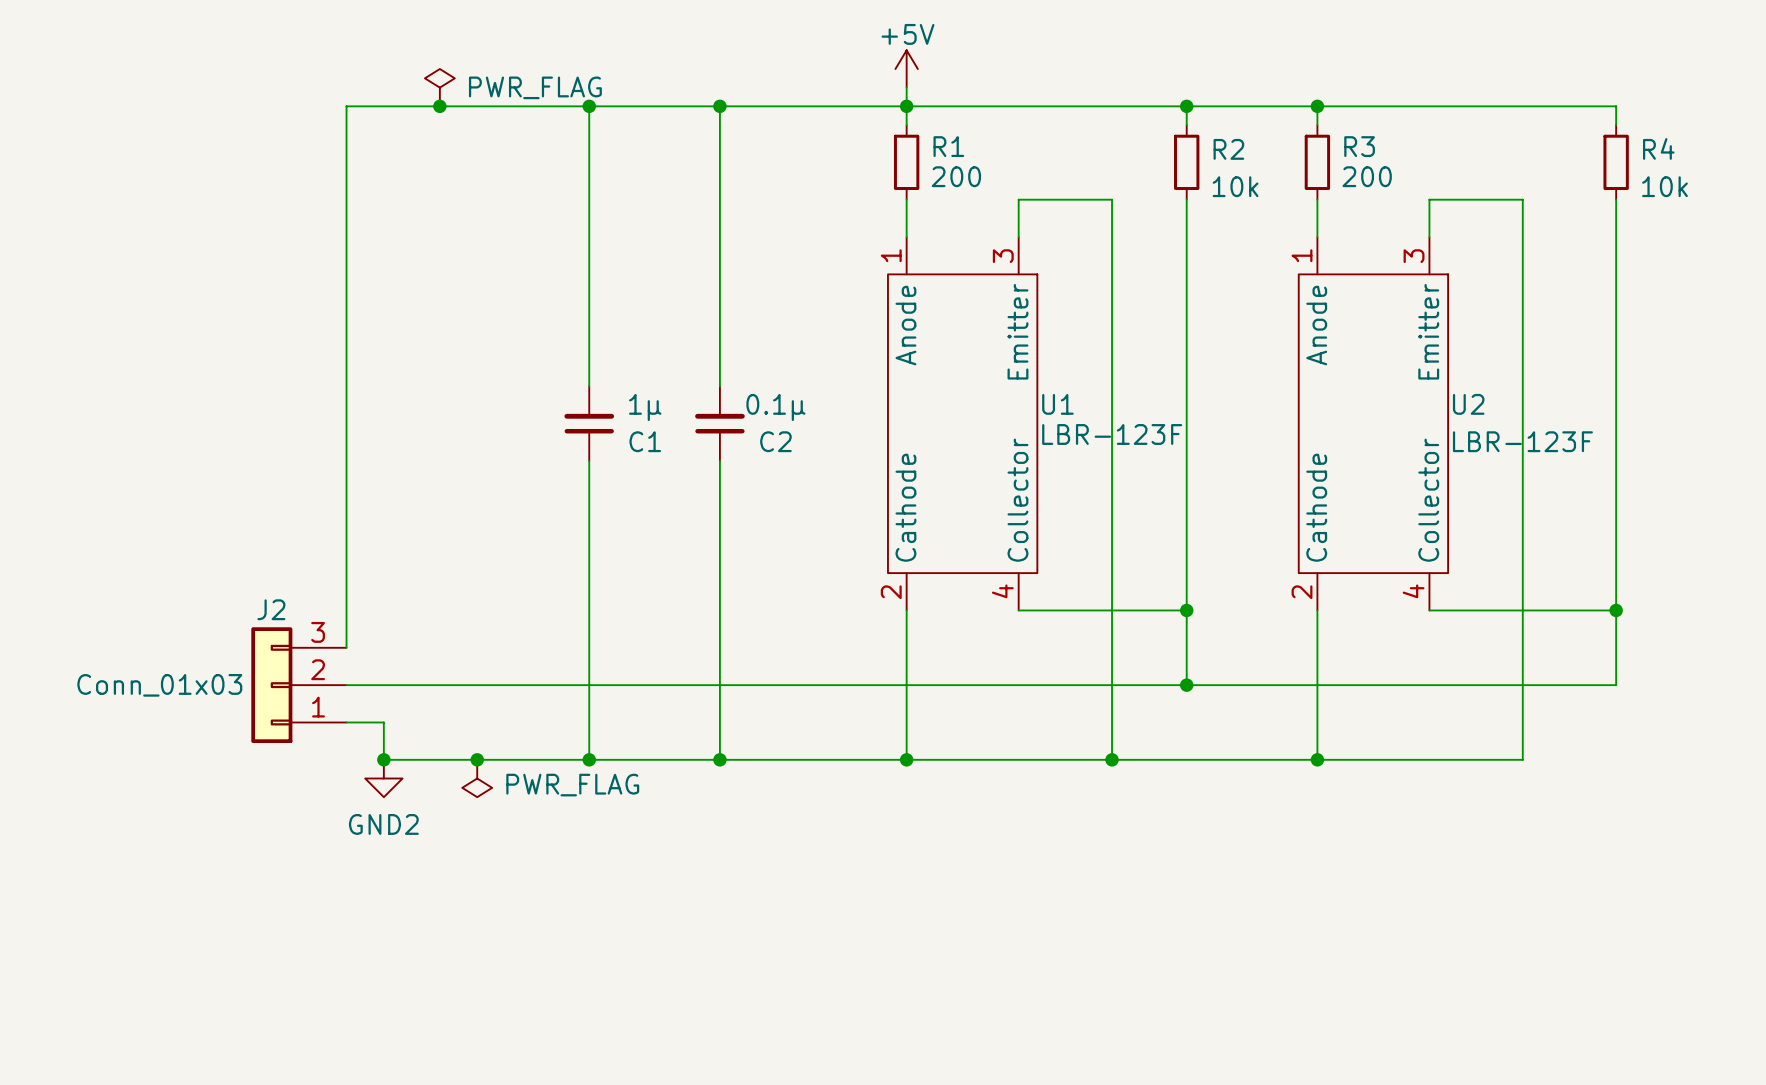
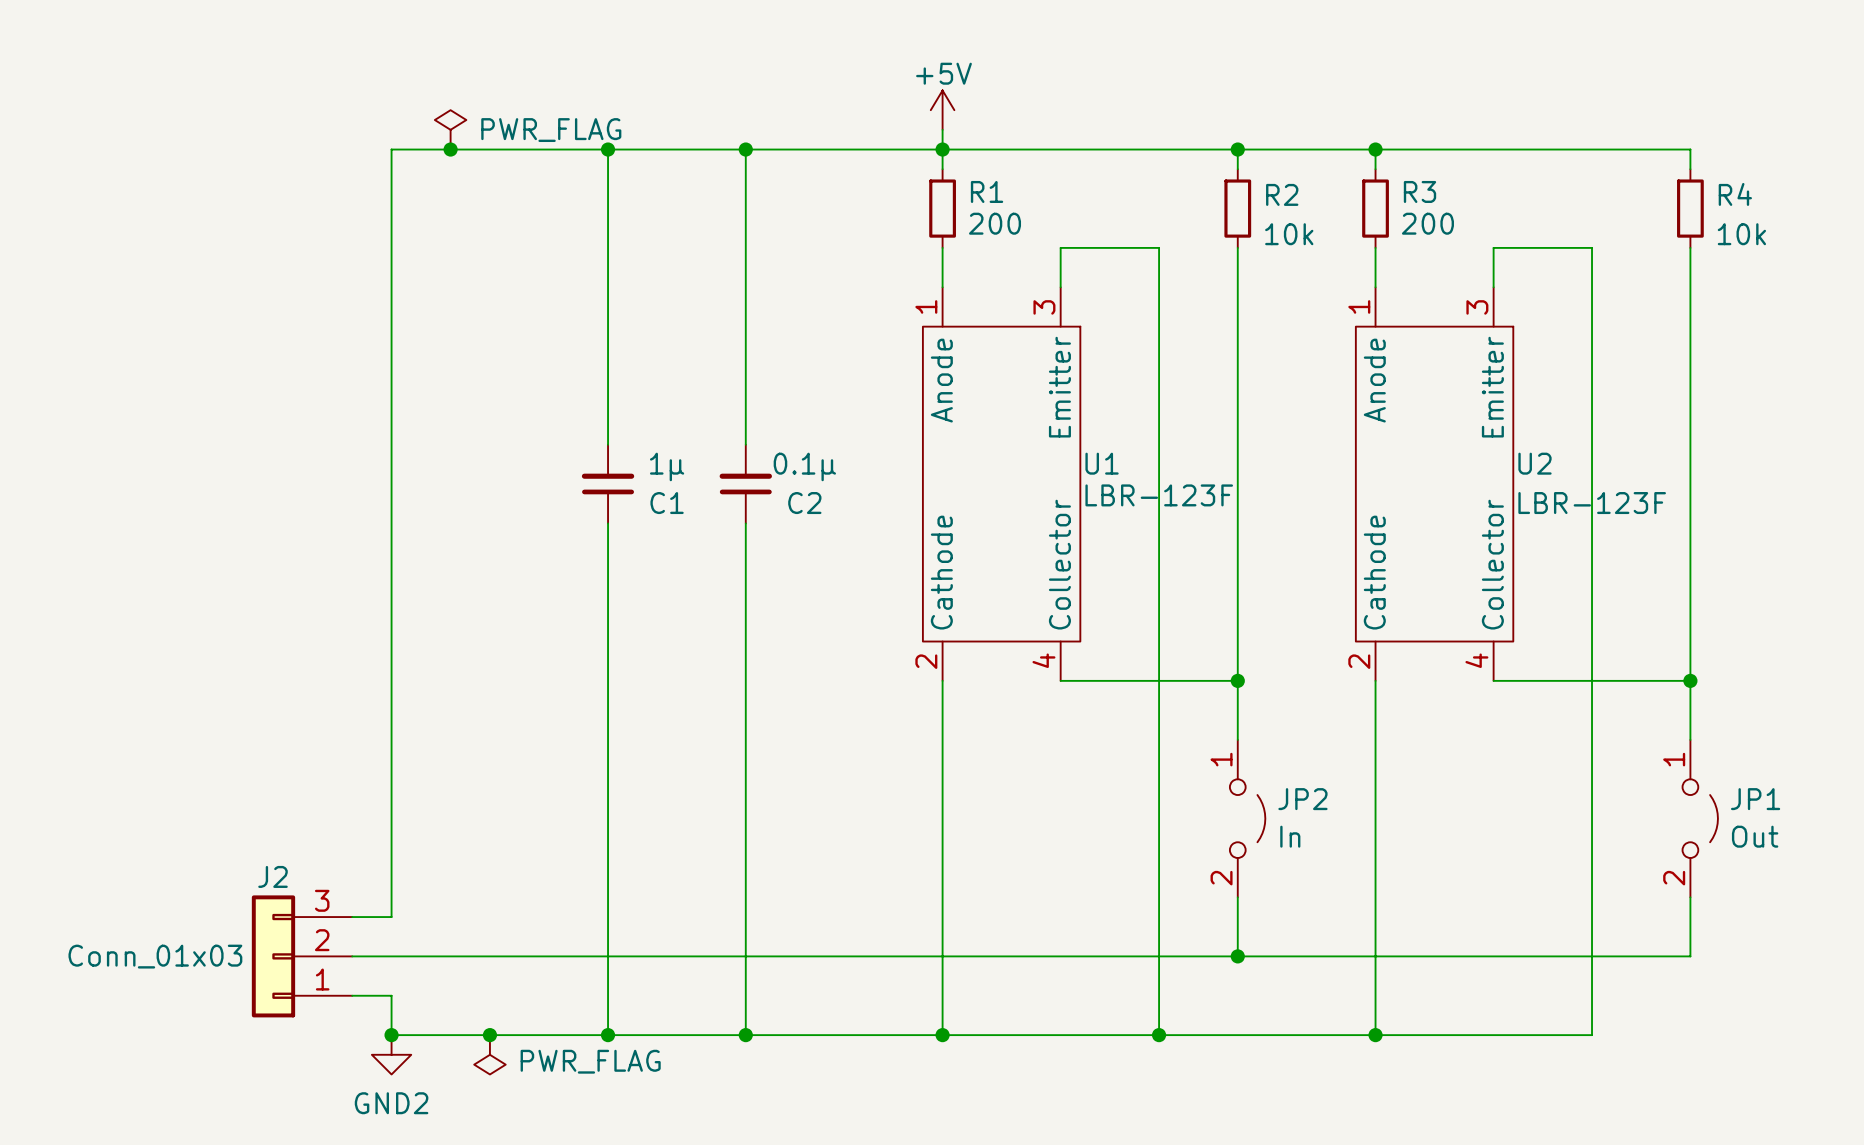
wire: (383, 106) (346, 106) (346, 647) -> (391, 149) (391, 798)
wire: (1616, 666) (1616, 685) (346, 685) -> none
J2 position: (298, 685) -> (302, 956)
junction: (1186, 685) -> none
wire: (346, 722) (383, 722) -> none
JP2: none -> In (1247, 818)
JP1: none -> Out (1700, 818)
wire: (383, 759) (1522, 759) -> (352, 995) (391, 995) (391, 1035) (1592, 1035) (1592, 838)
wire: none -> (391, 838) (391, 917) (352, 917)
junction: (383, 759) -> none
junction: (477, 759) -> none
wire: none -> (608, 838) (608, 1035)
junction: (589, 759) -> none
wire: none -> (745, 838) (745, 1035)
junction: (719, 759) -> none
wire: none -> (942, 838) (942, 1035)
junction: (906, 759) -> none
wire: none -> (1159, 838) (1159, 1035)
junction: (1112, 759) -> none
wire: none -> (1375, 838) (1375, 1035)
junction: (1317, 759) -> none
power symbol position: GND2 (383, 778) -> GND2 (391, 1054)
power symbol position: PWR_FLAG (477, 778) -> PWR_FLAG (489, 1054)
wire: none -> (1237, 897) (1237, 956)
wire: none -> (1690, 897) (1690, 956) (352, 956)
junction: none -> (1237, 956)
junction: none -> (391, 1035)
junction: none -> (489, 1035)
junction: none -> (608, 1035)
junction: none -> (745, 1035)
junction: none -> (942, 1035)
junction: none -> (1159, 1035)
junction: none -> (1375, 1035)

